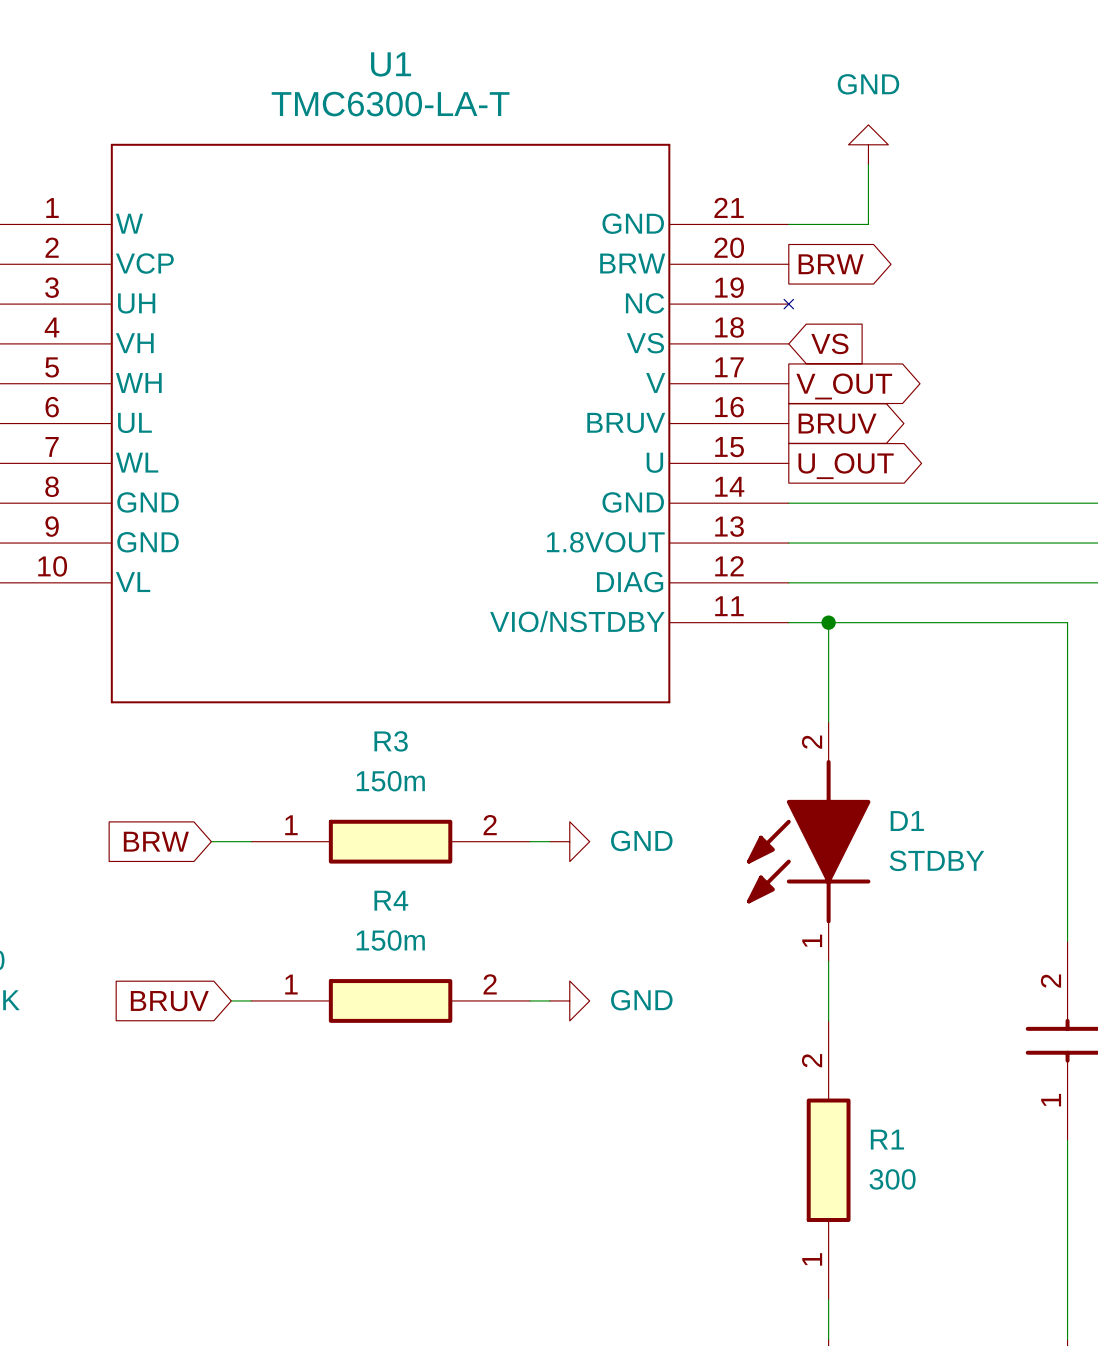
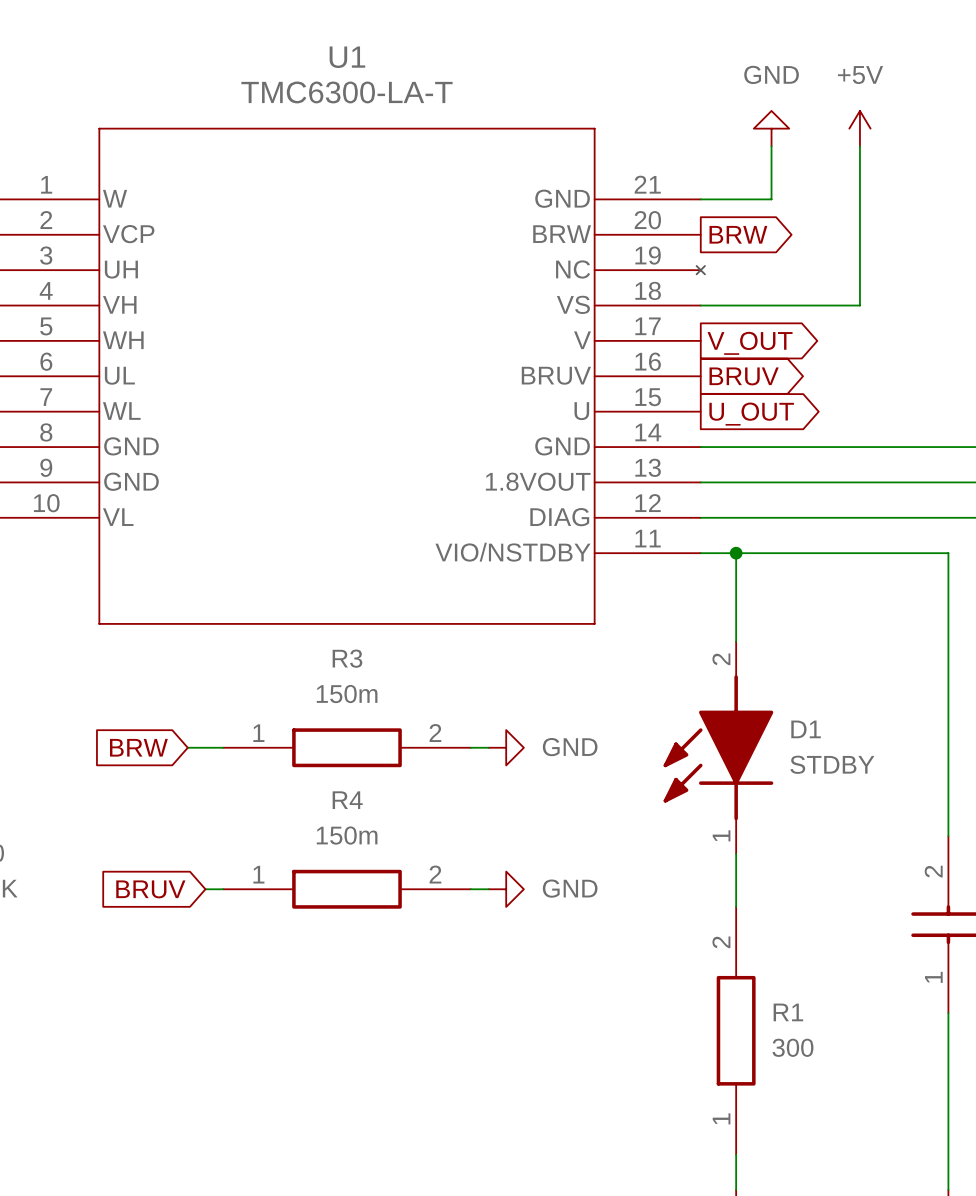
power symbol: none -> +5V (859, 128)
wire: none -> (859, 146) (859, 305) (700, 305)
global label: VS (829, 343) -> none

